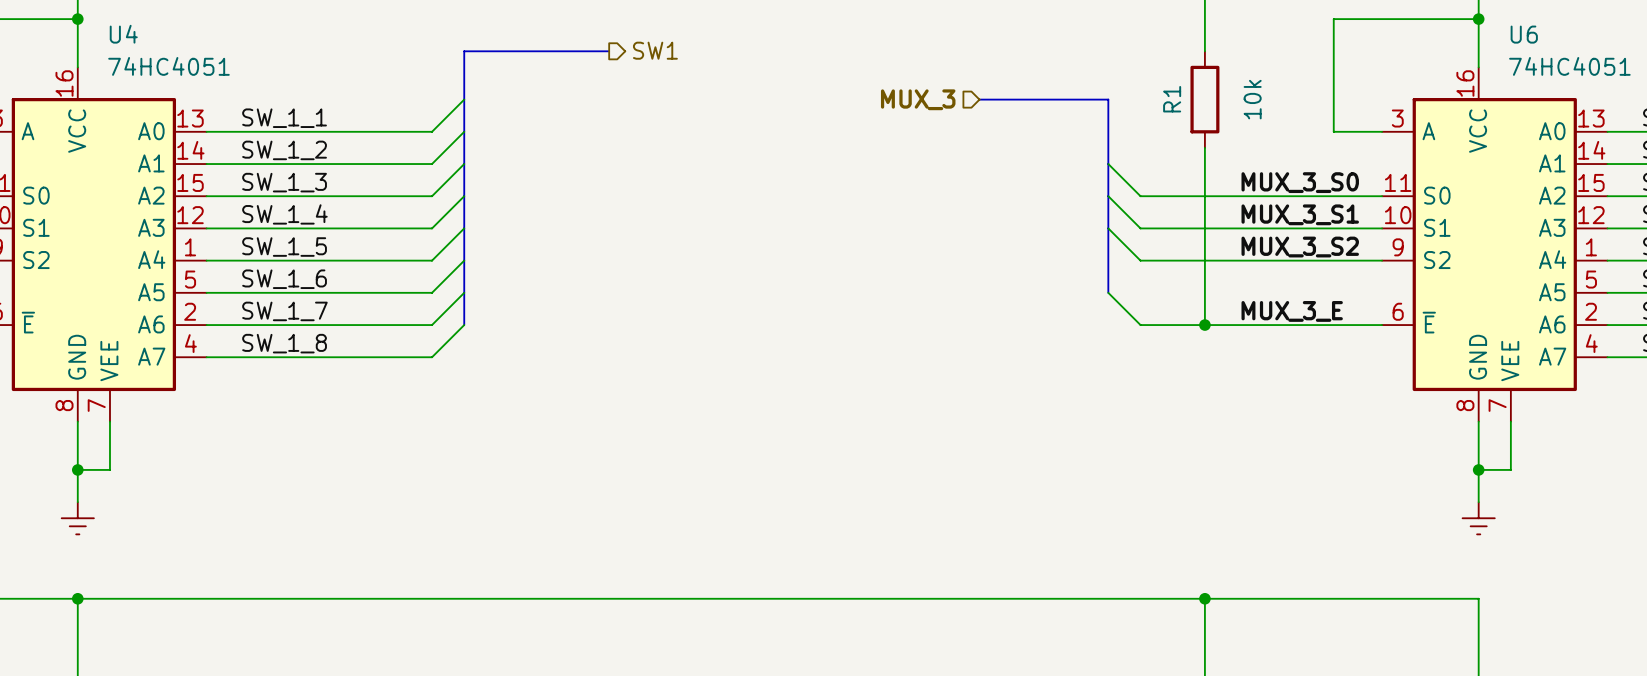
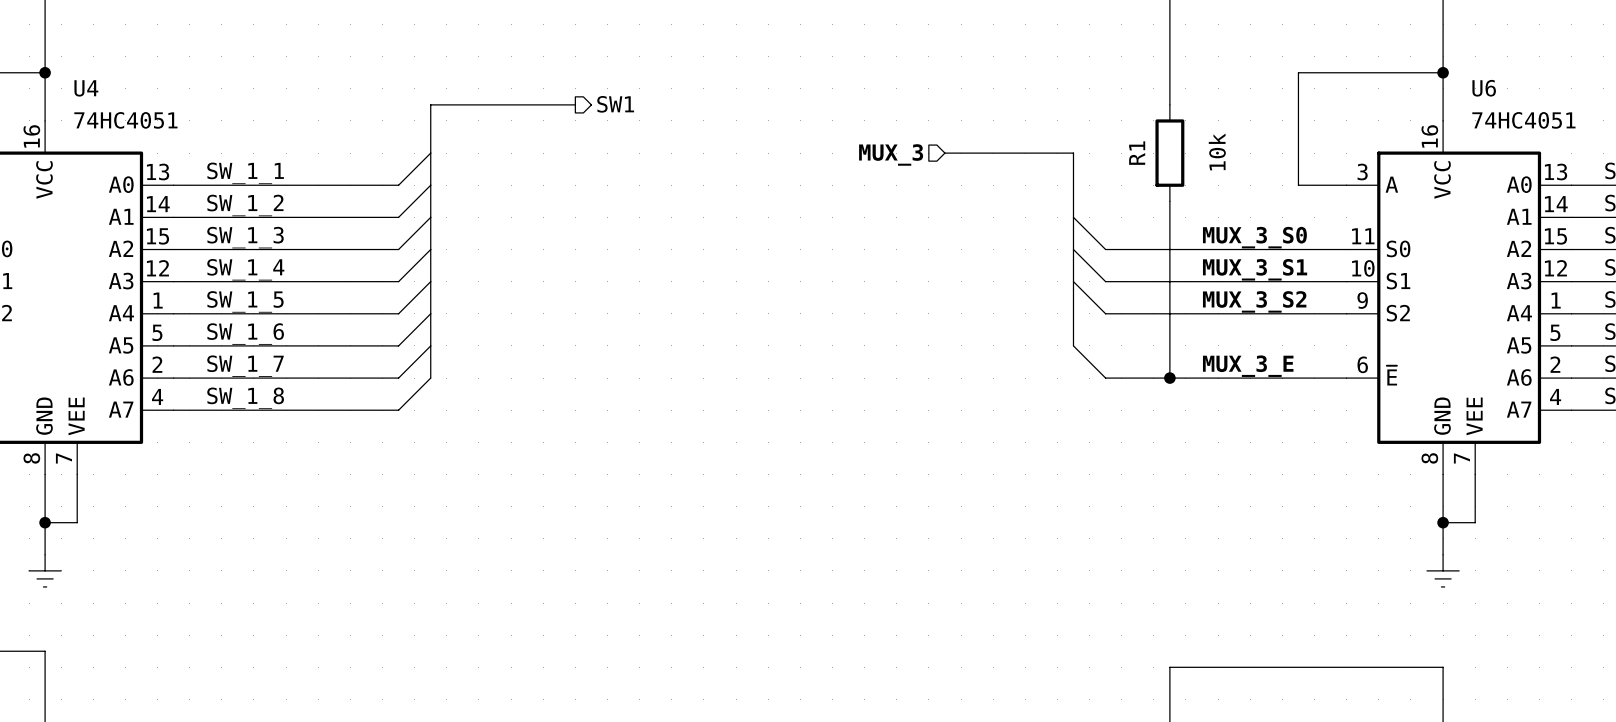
wire: (77, 598) (1478, 598) (1478, 614) -> none
junction: (77, 598) -> none
wire: (1204, 598) (1204, 614) -> (1443, 667) (1169, 667)
junction: (1204, 598) -> none

